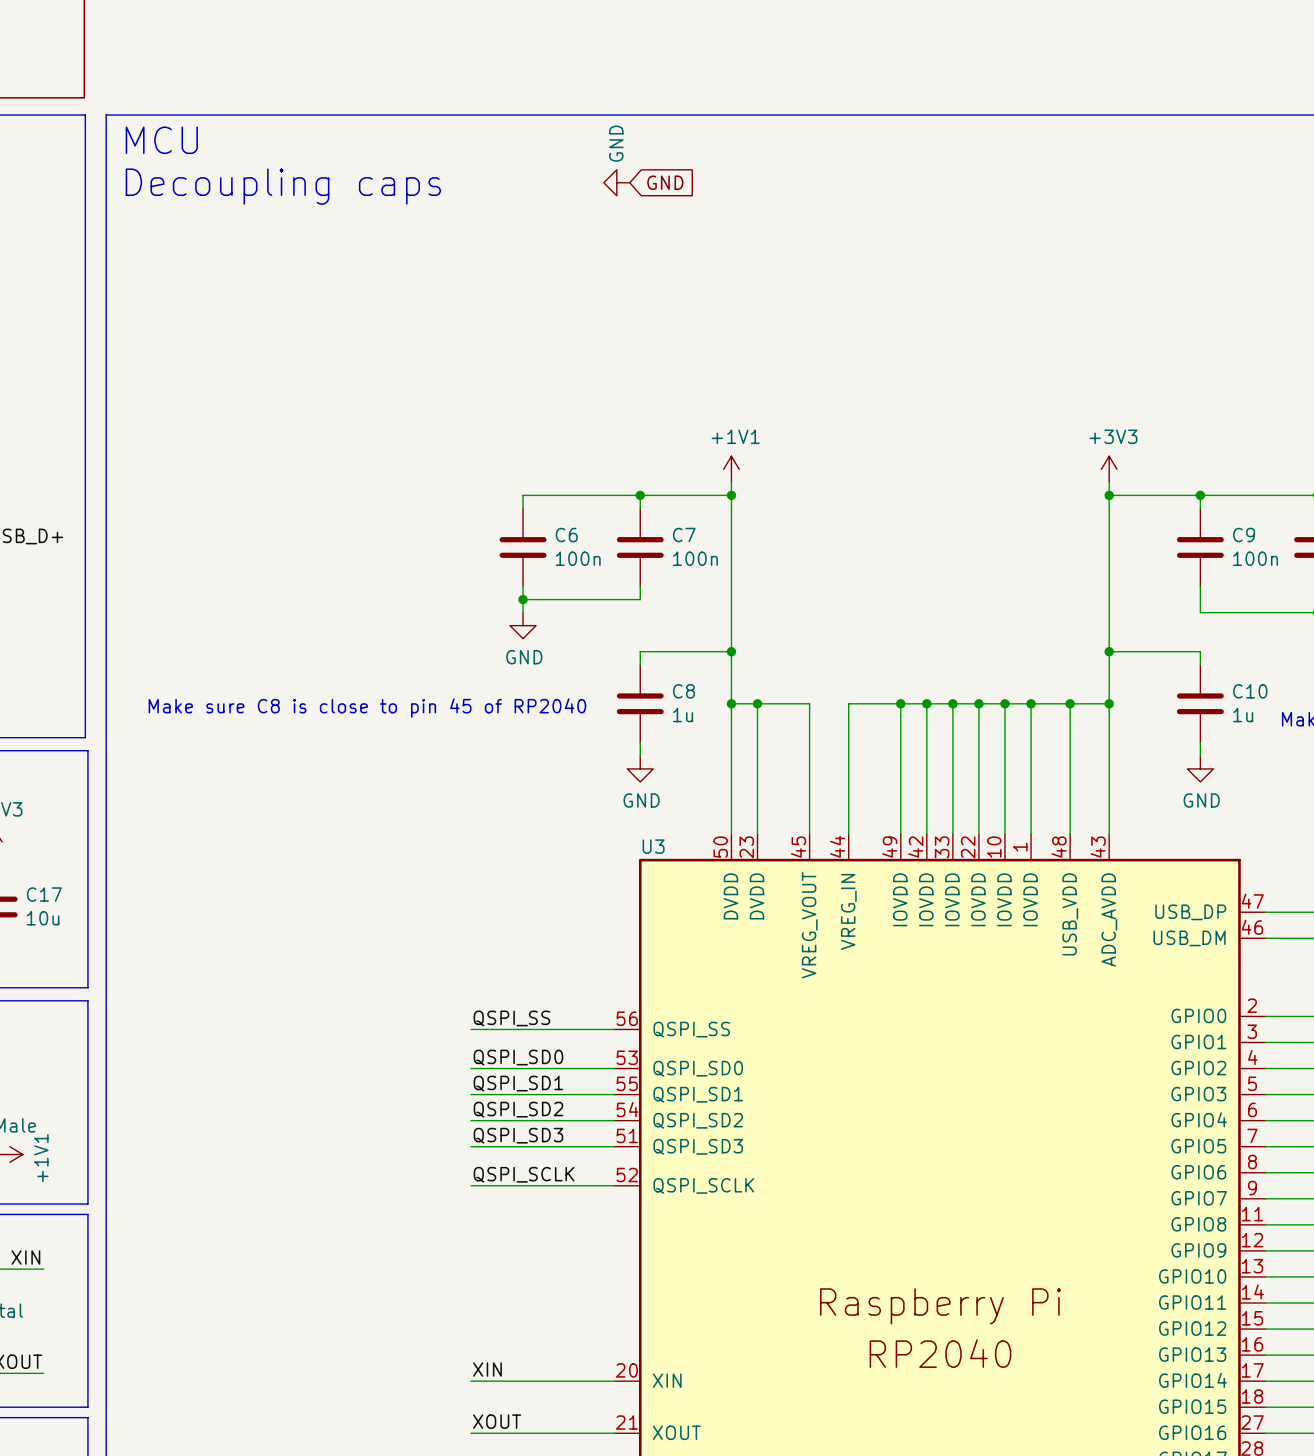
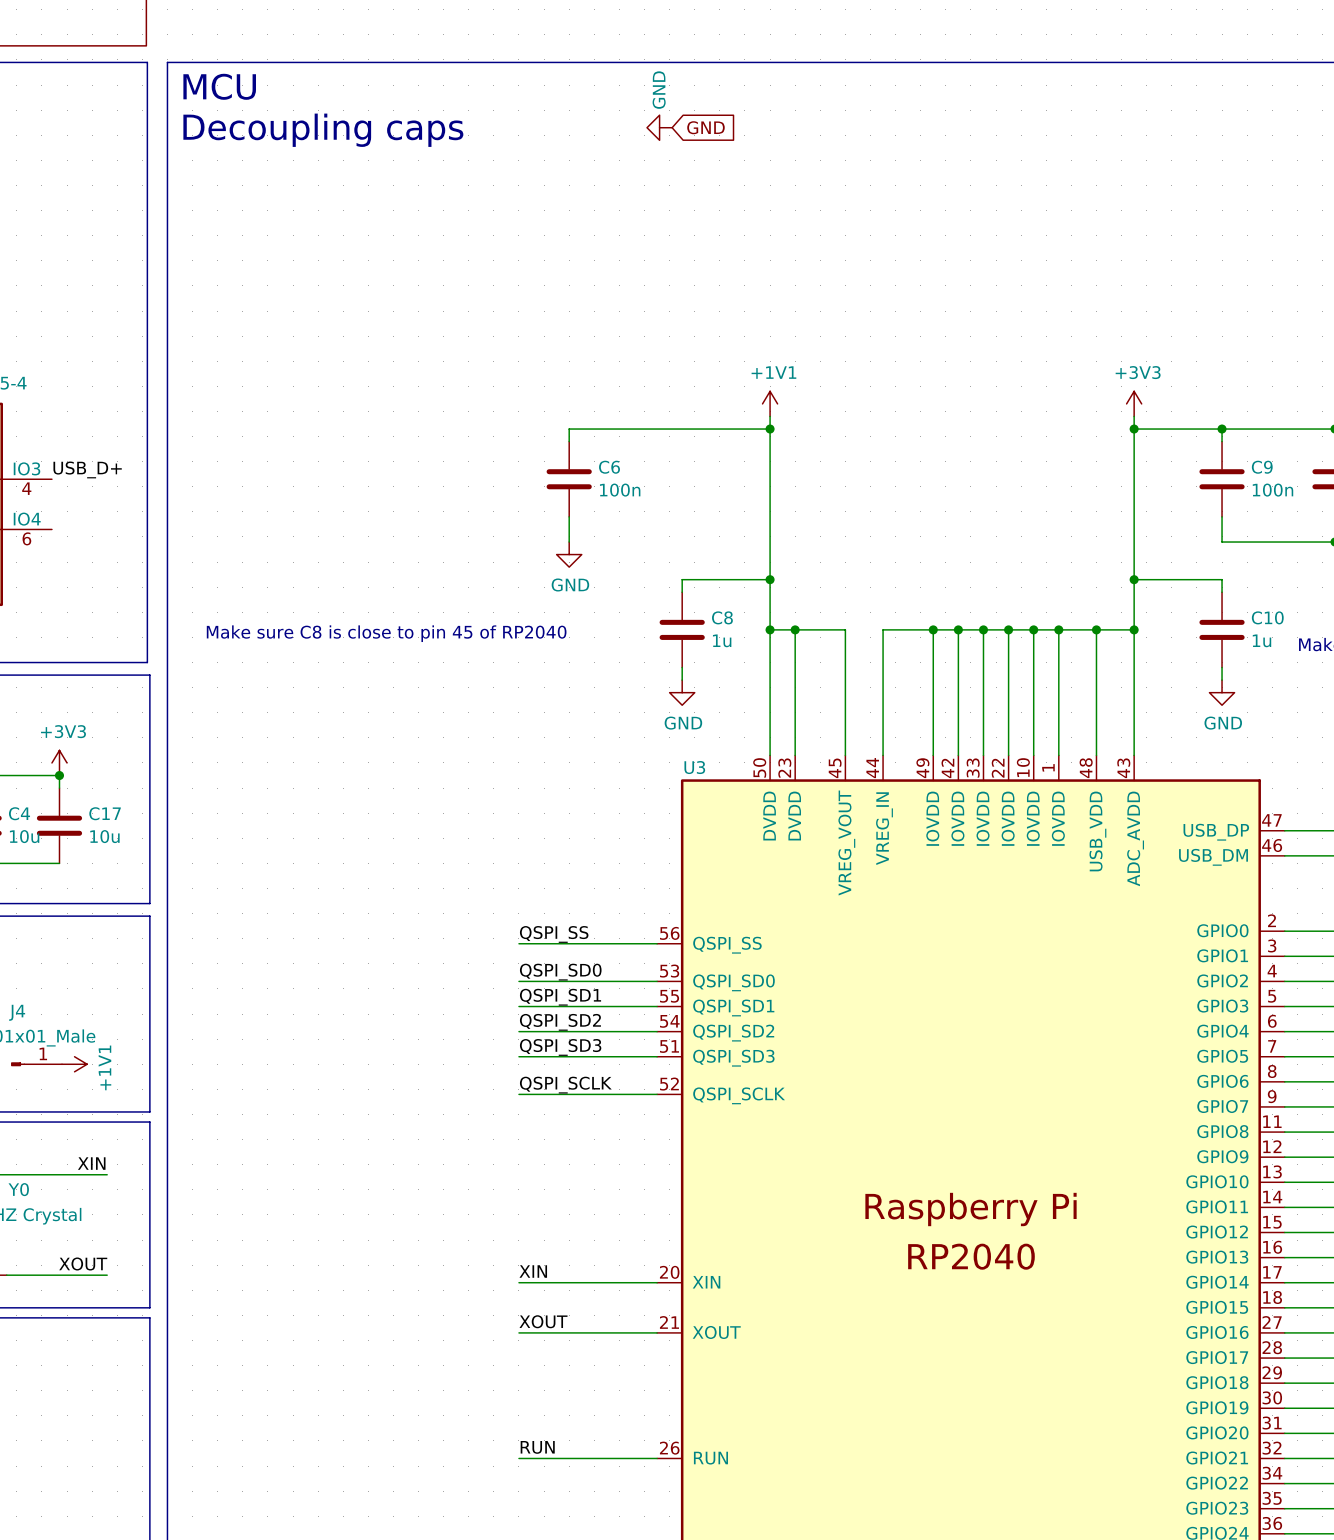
wire: (640, 495) (640, 508) -> none
junction: (640, 495) -> none
C7: 100n (640, 547) -> none
wire: (640, 586) (640, 599) (523, 599) -> none
junction: (523, 599) -> none

